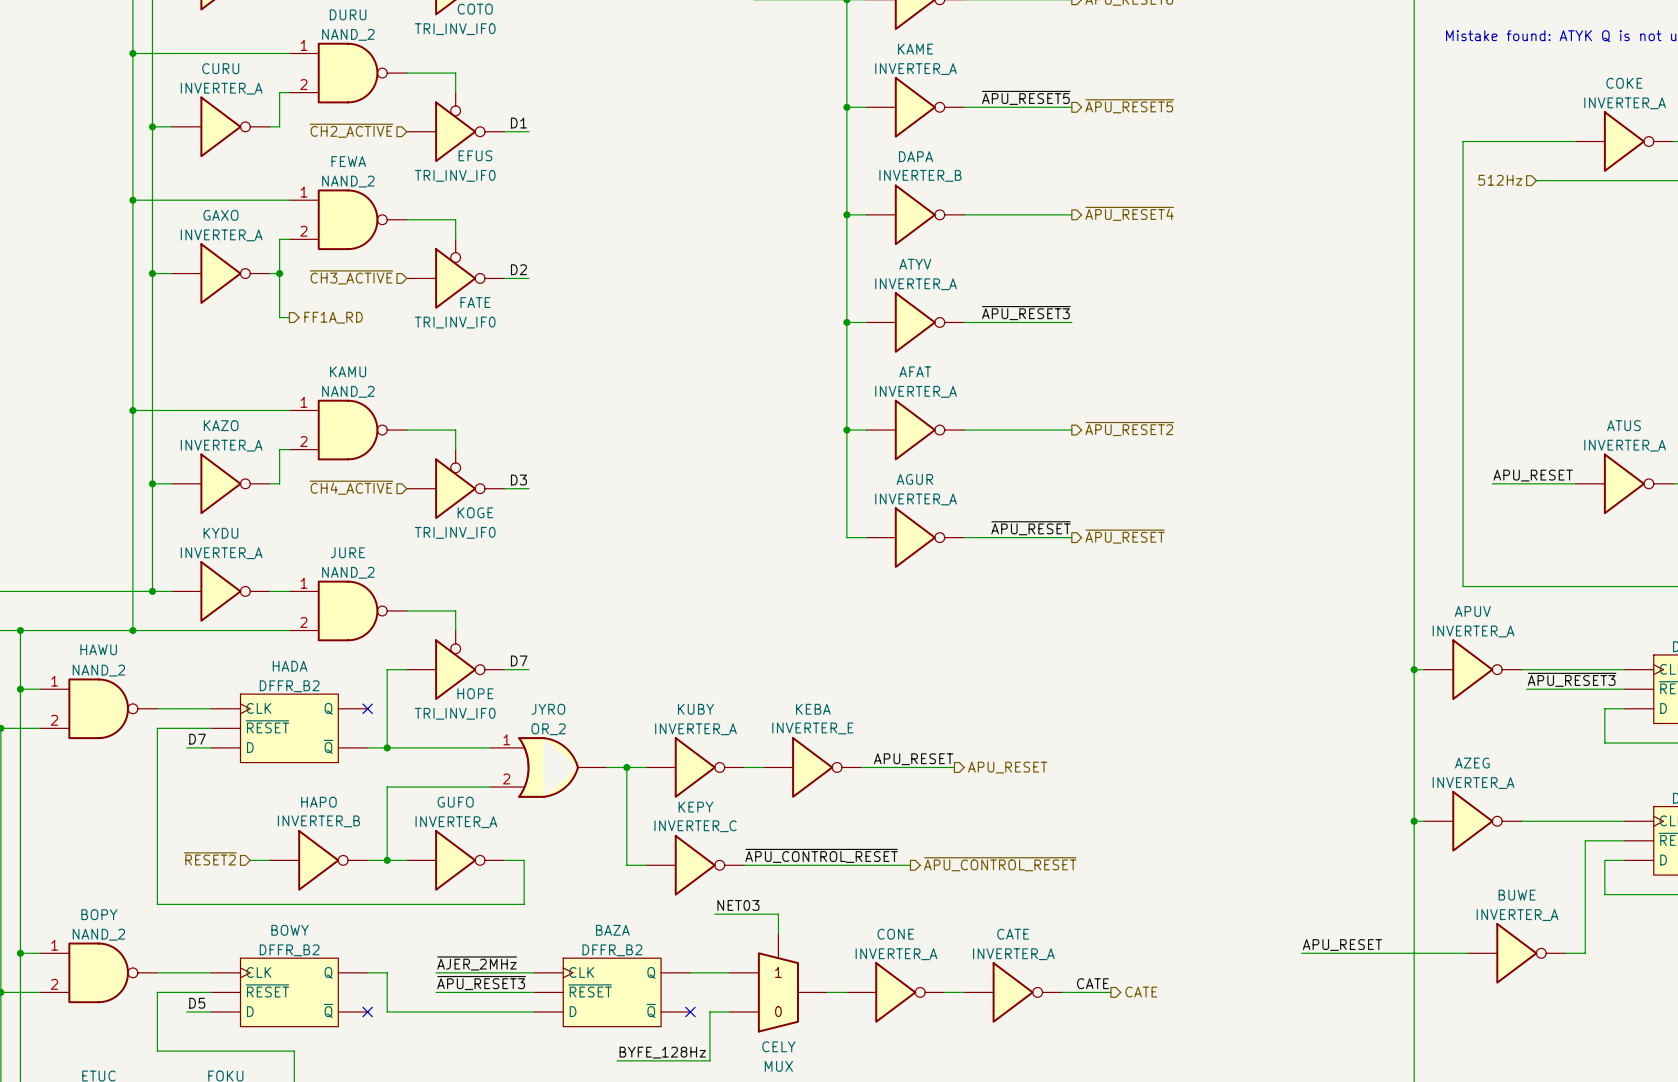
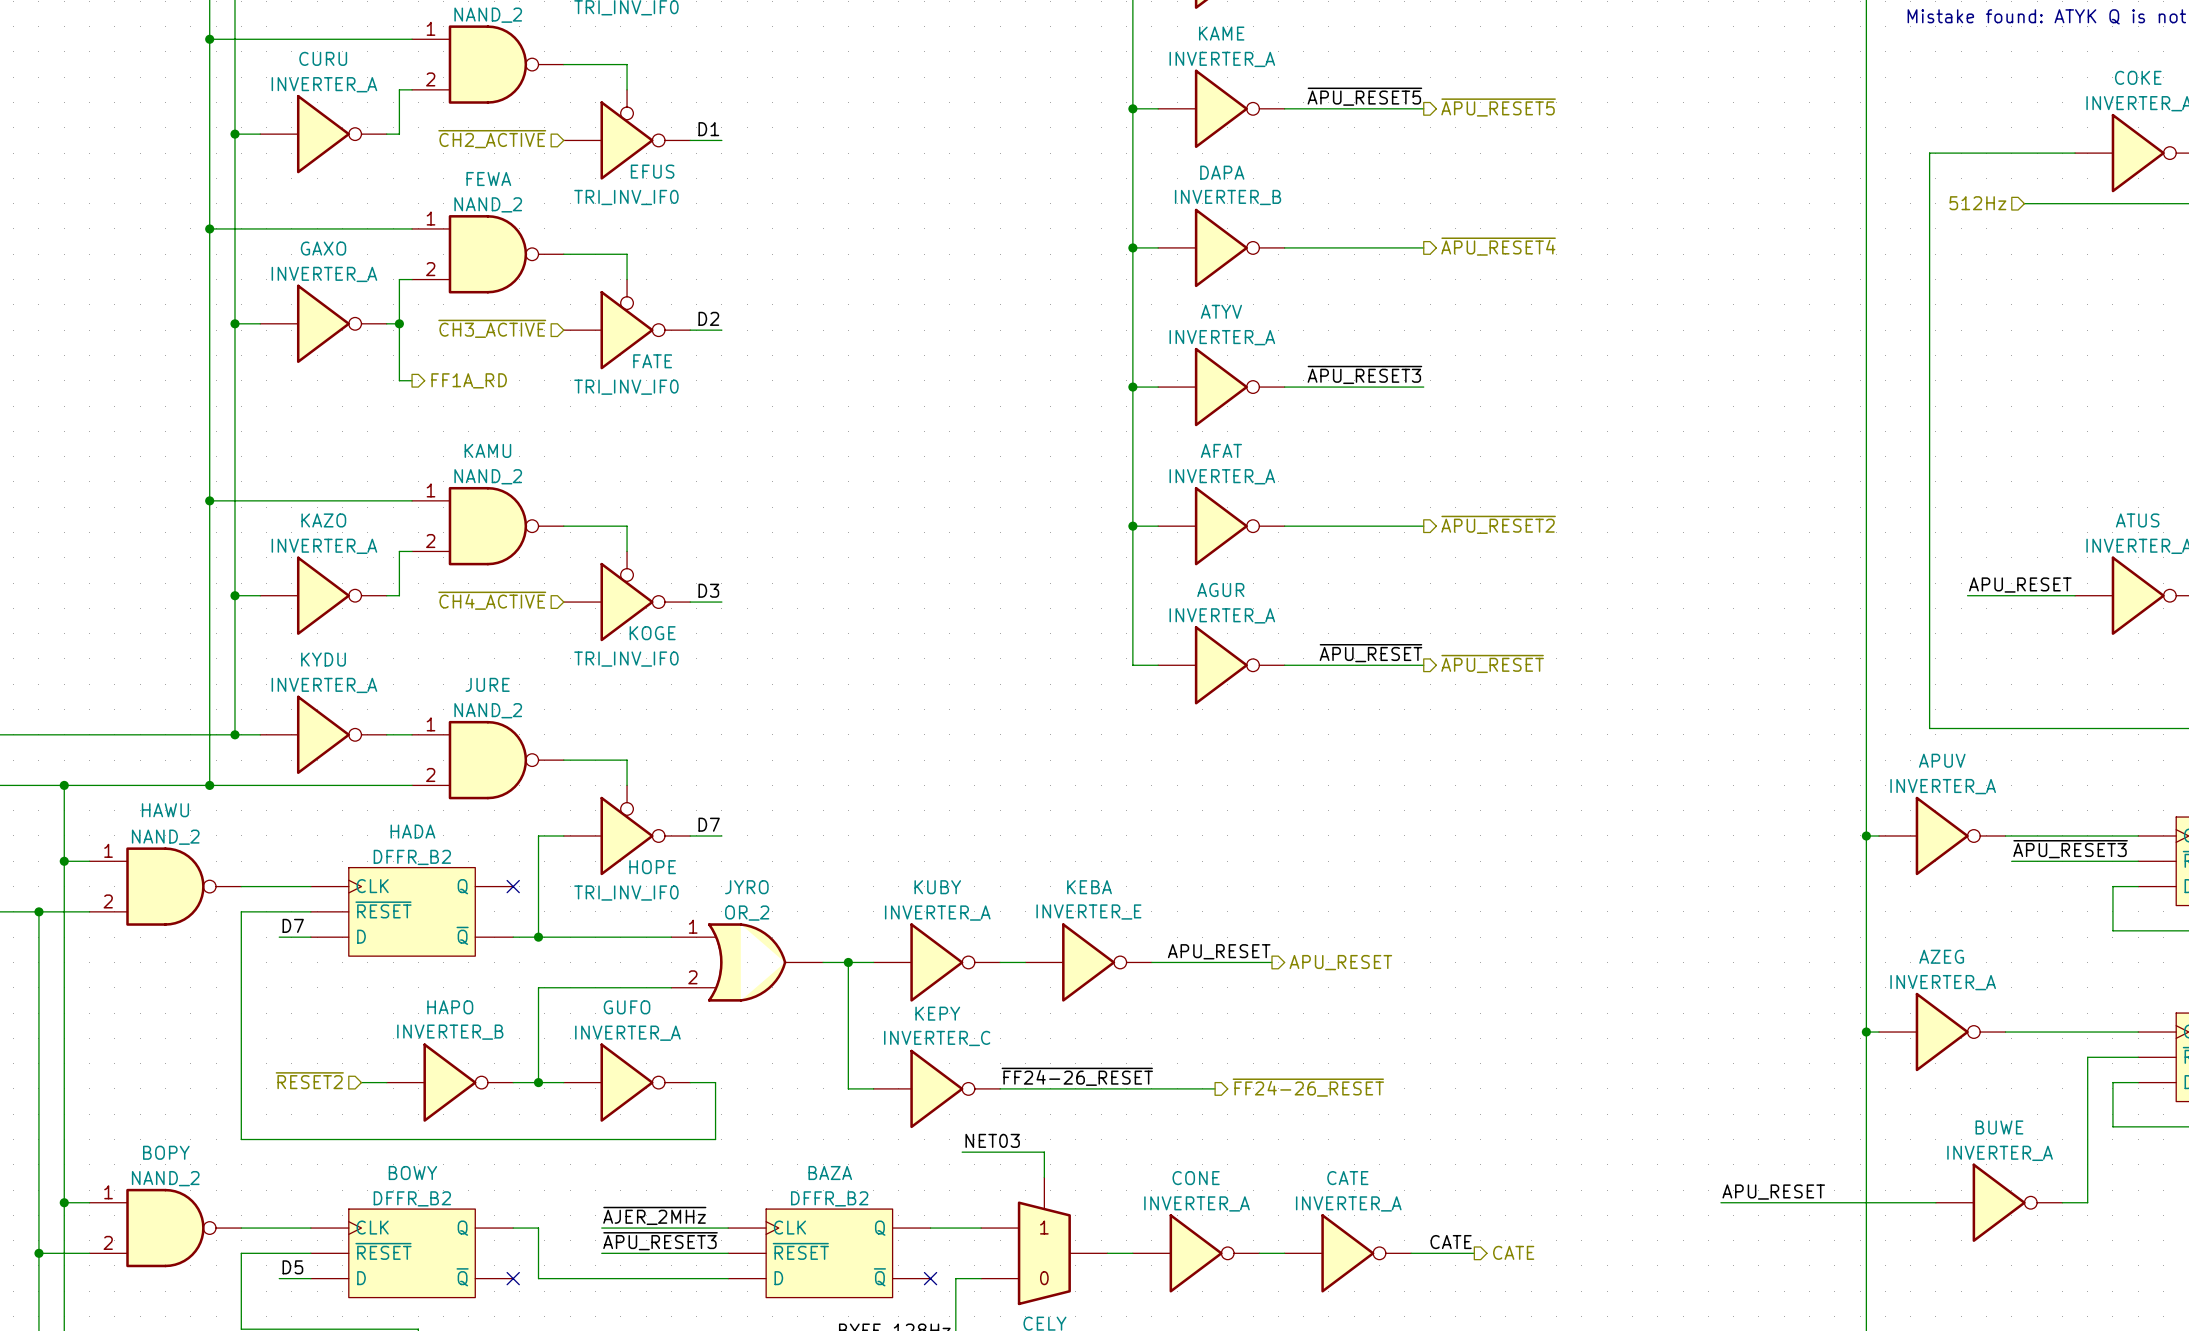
label: ~{APU_CONTROL_RESET} (821, 855) -> ~{FF24-26_RESET} (1077, 1076)
hierarchical label: ~{APU_CONTROL_RESET} (1000, 864) -> ~{FF24-26_RESET} (1308, 1087)

